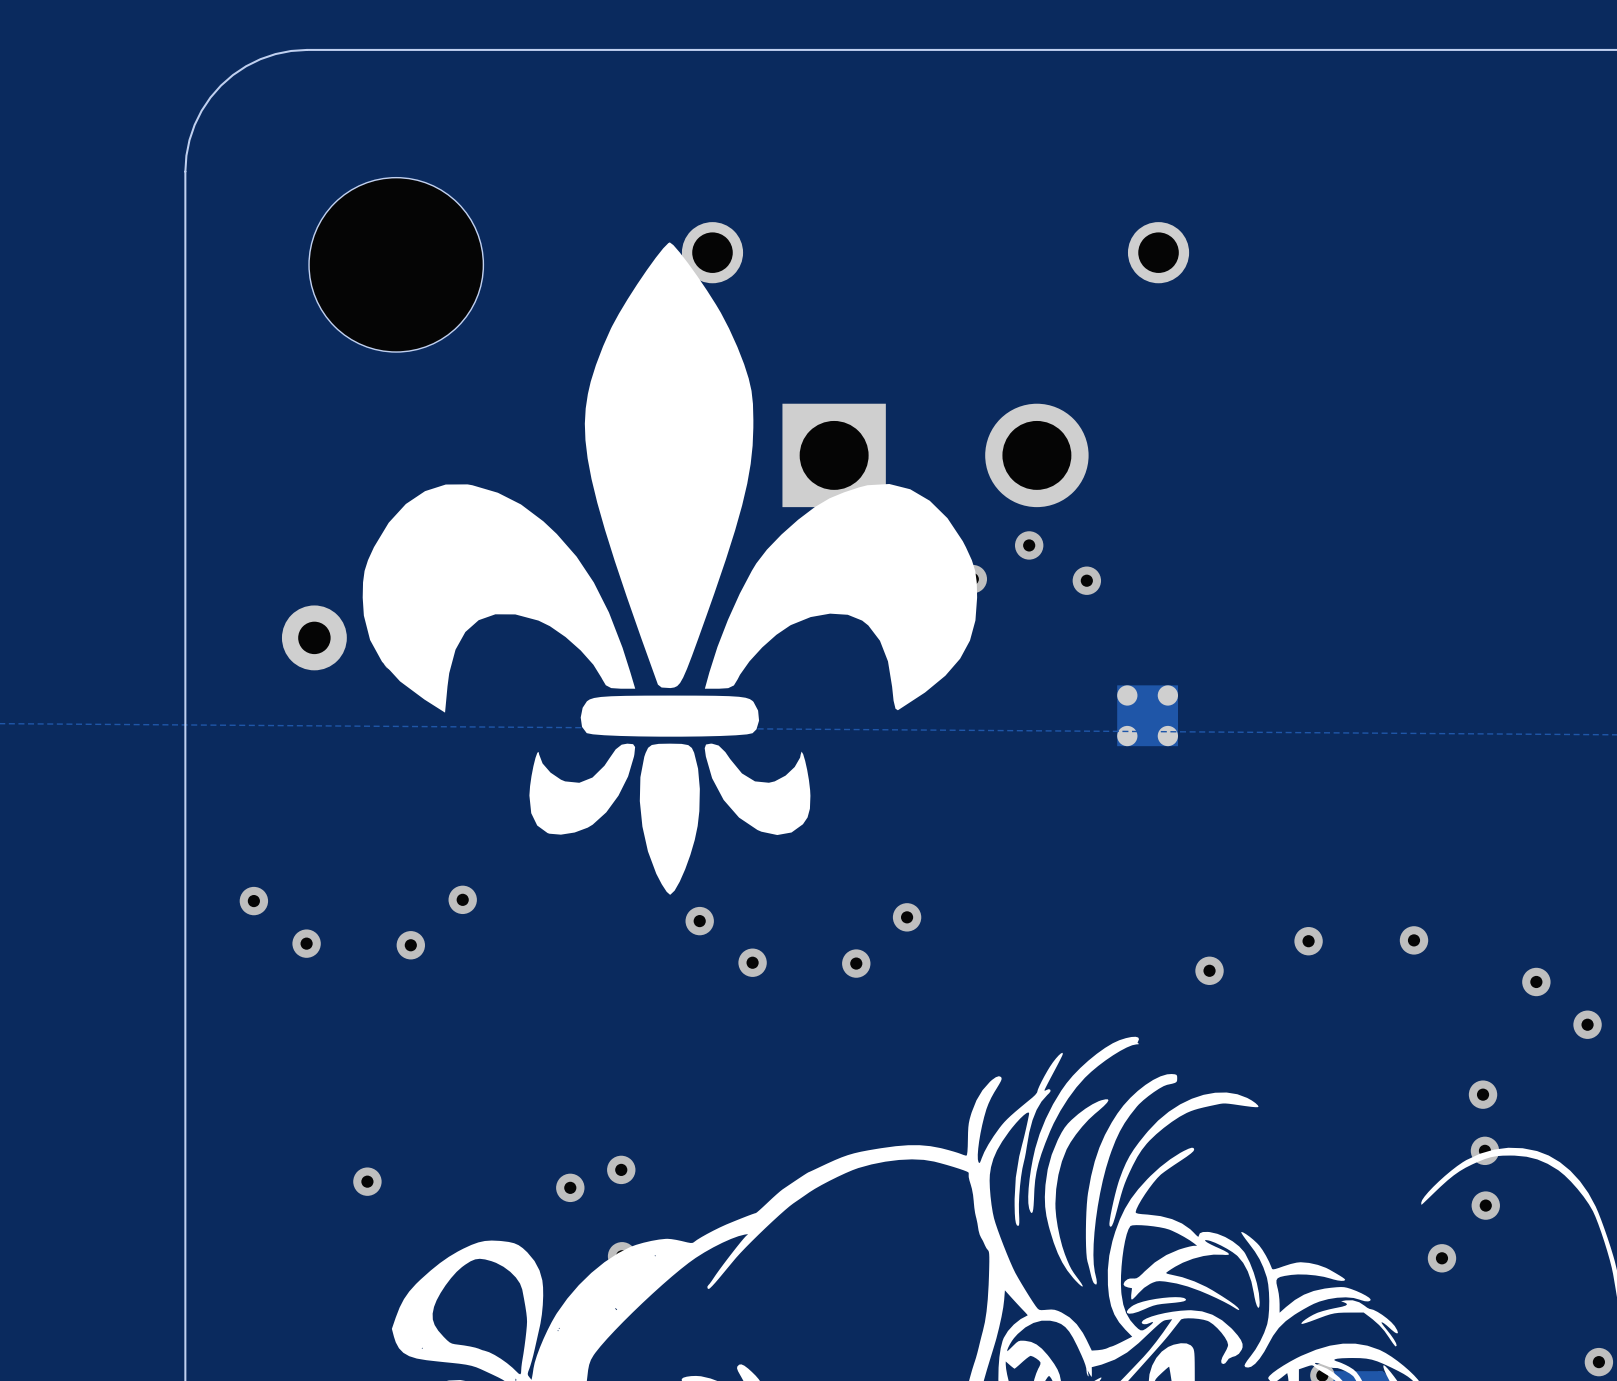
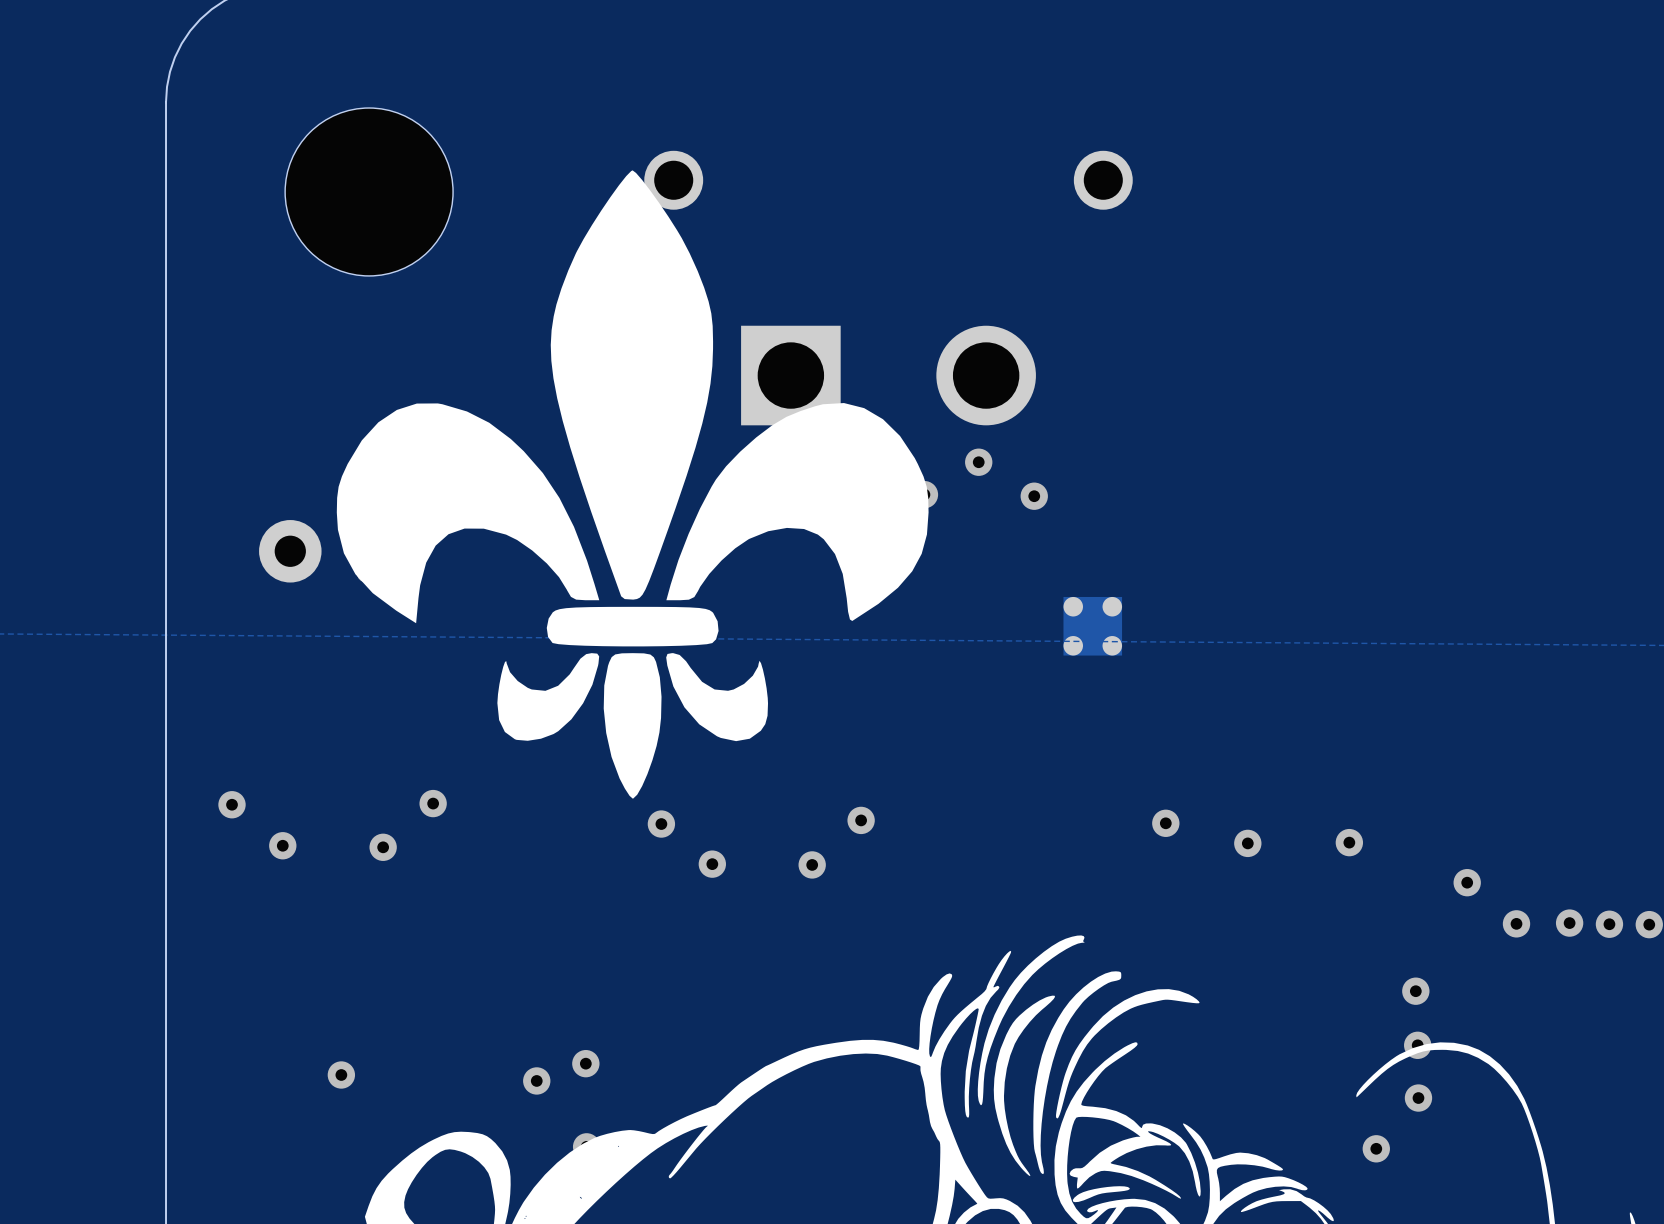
via position: (1209, 970) -> (1165, 823)

